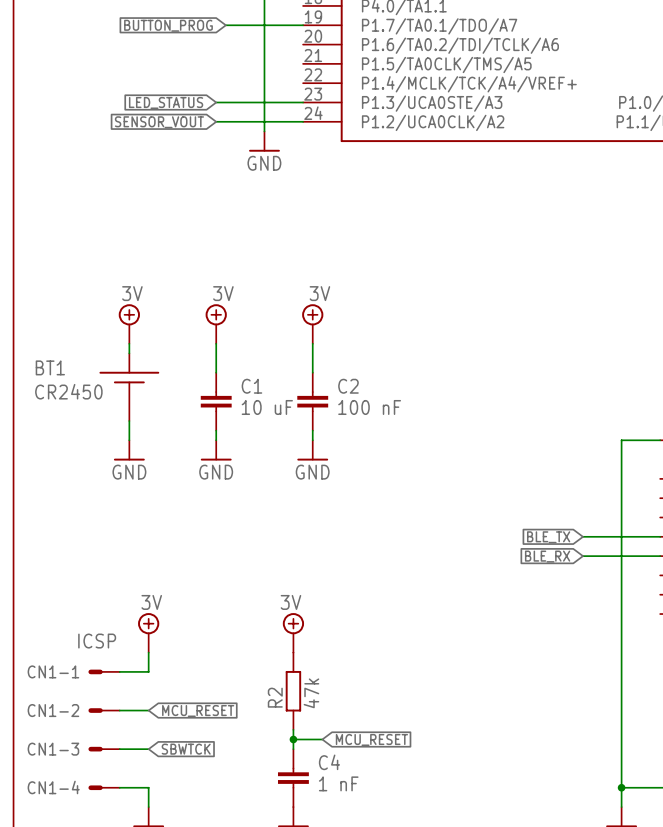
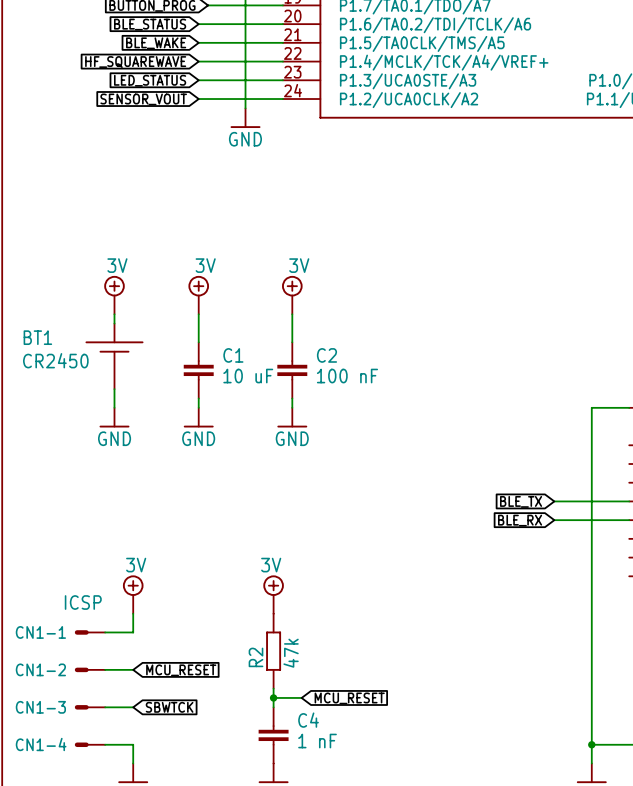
wire: none -> (198, 24) (282, 24)
global label: none -> BLE_STATUS (150, 24)
wire: none -> (198, 42) (282, 42)
global label: none -> BLE_WAKE (156, 43)
global label: none -> HF_SQUAREWAVE (135, 62)
wire: none -> (198, 61) (282, 61)

